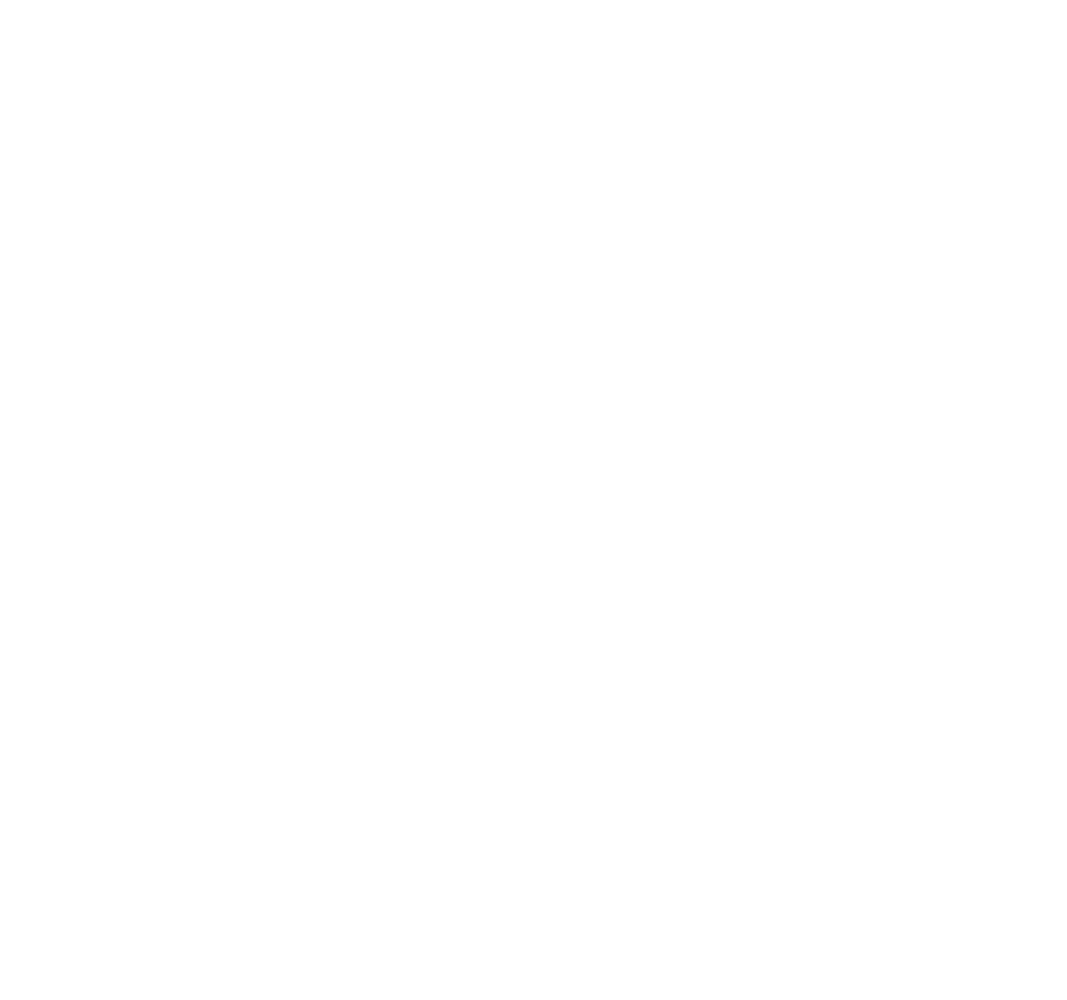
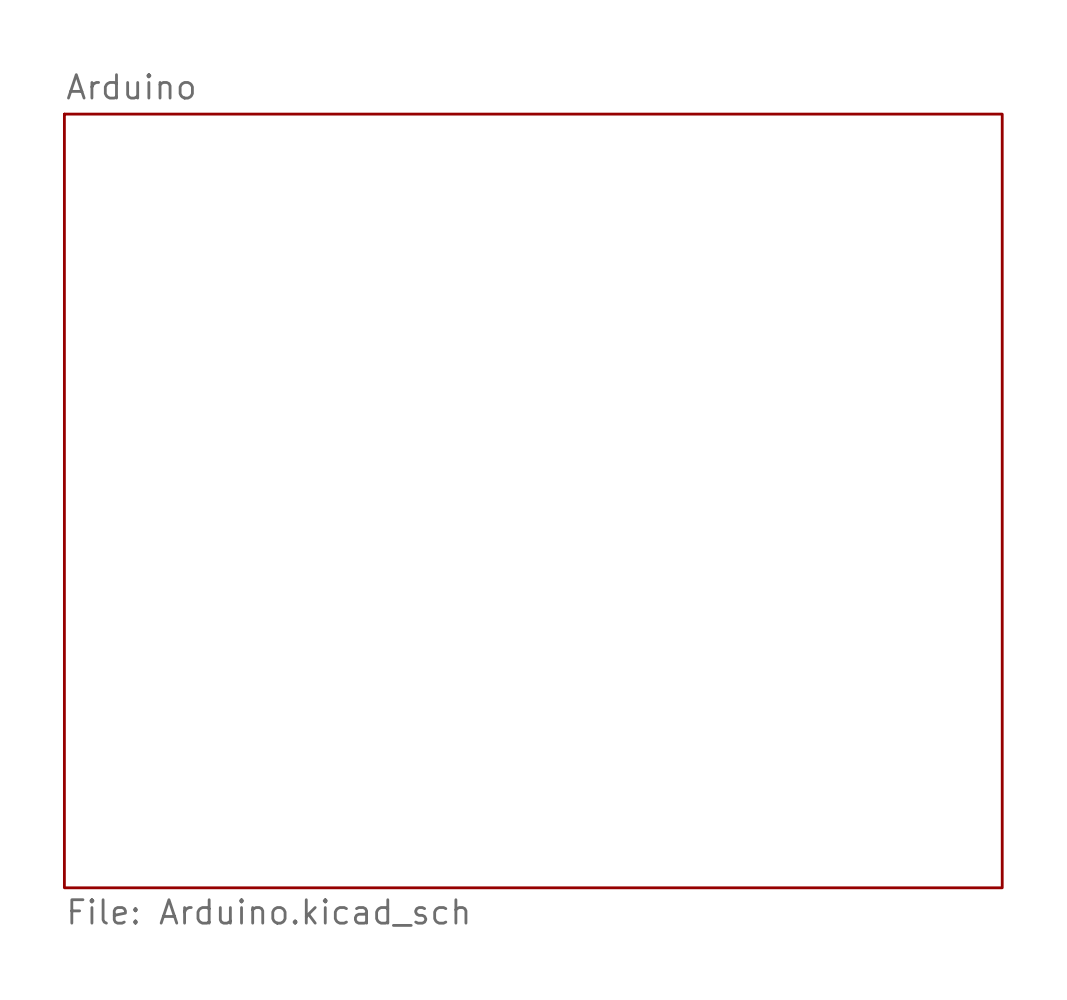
sheet Arduino: none -> File: Arduino.kicad_sch (533, 500)

